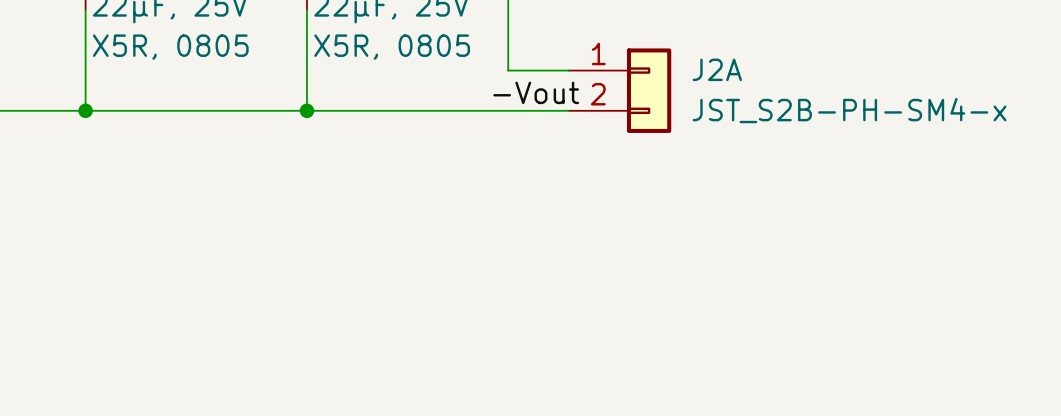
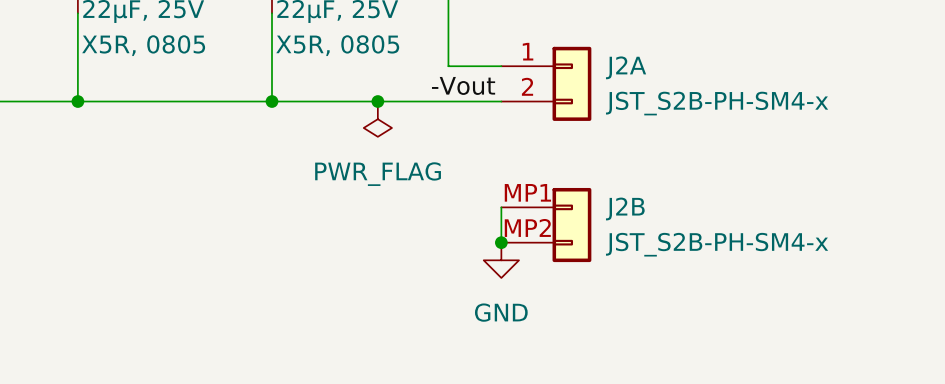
junction: none -> (377, 101)
power symbol: none -> PWR_FLAG (377, 119)
wire: none -> (501, 207) (501, 242)
J2B: none -> JST_S2B-PH-SM4-x (546, 225)
junction: none -> (501, 242)
power symbol: none -> GND (501, 260)

